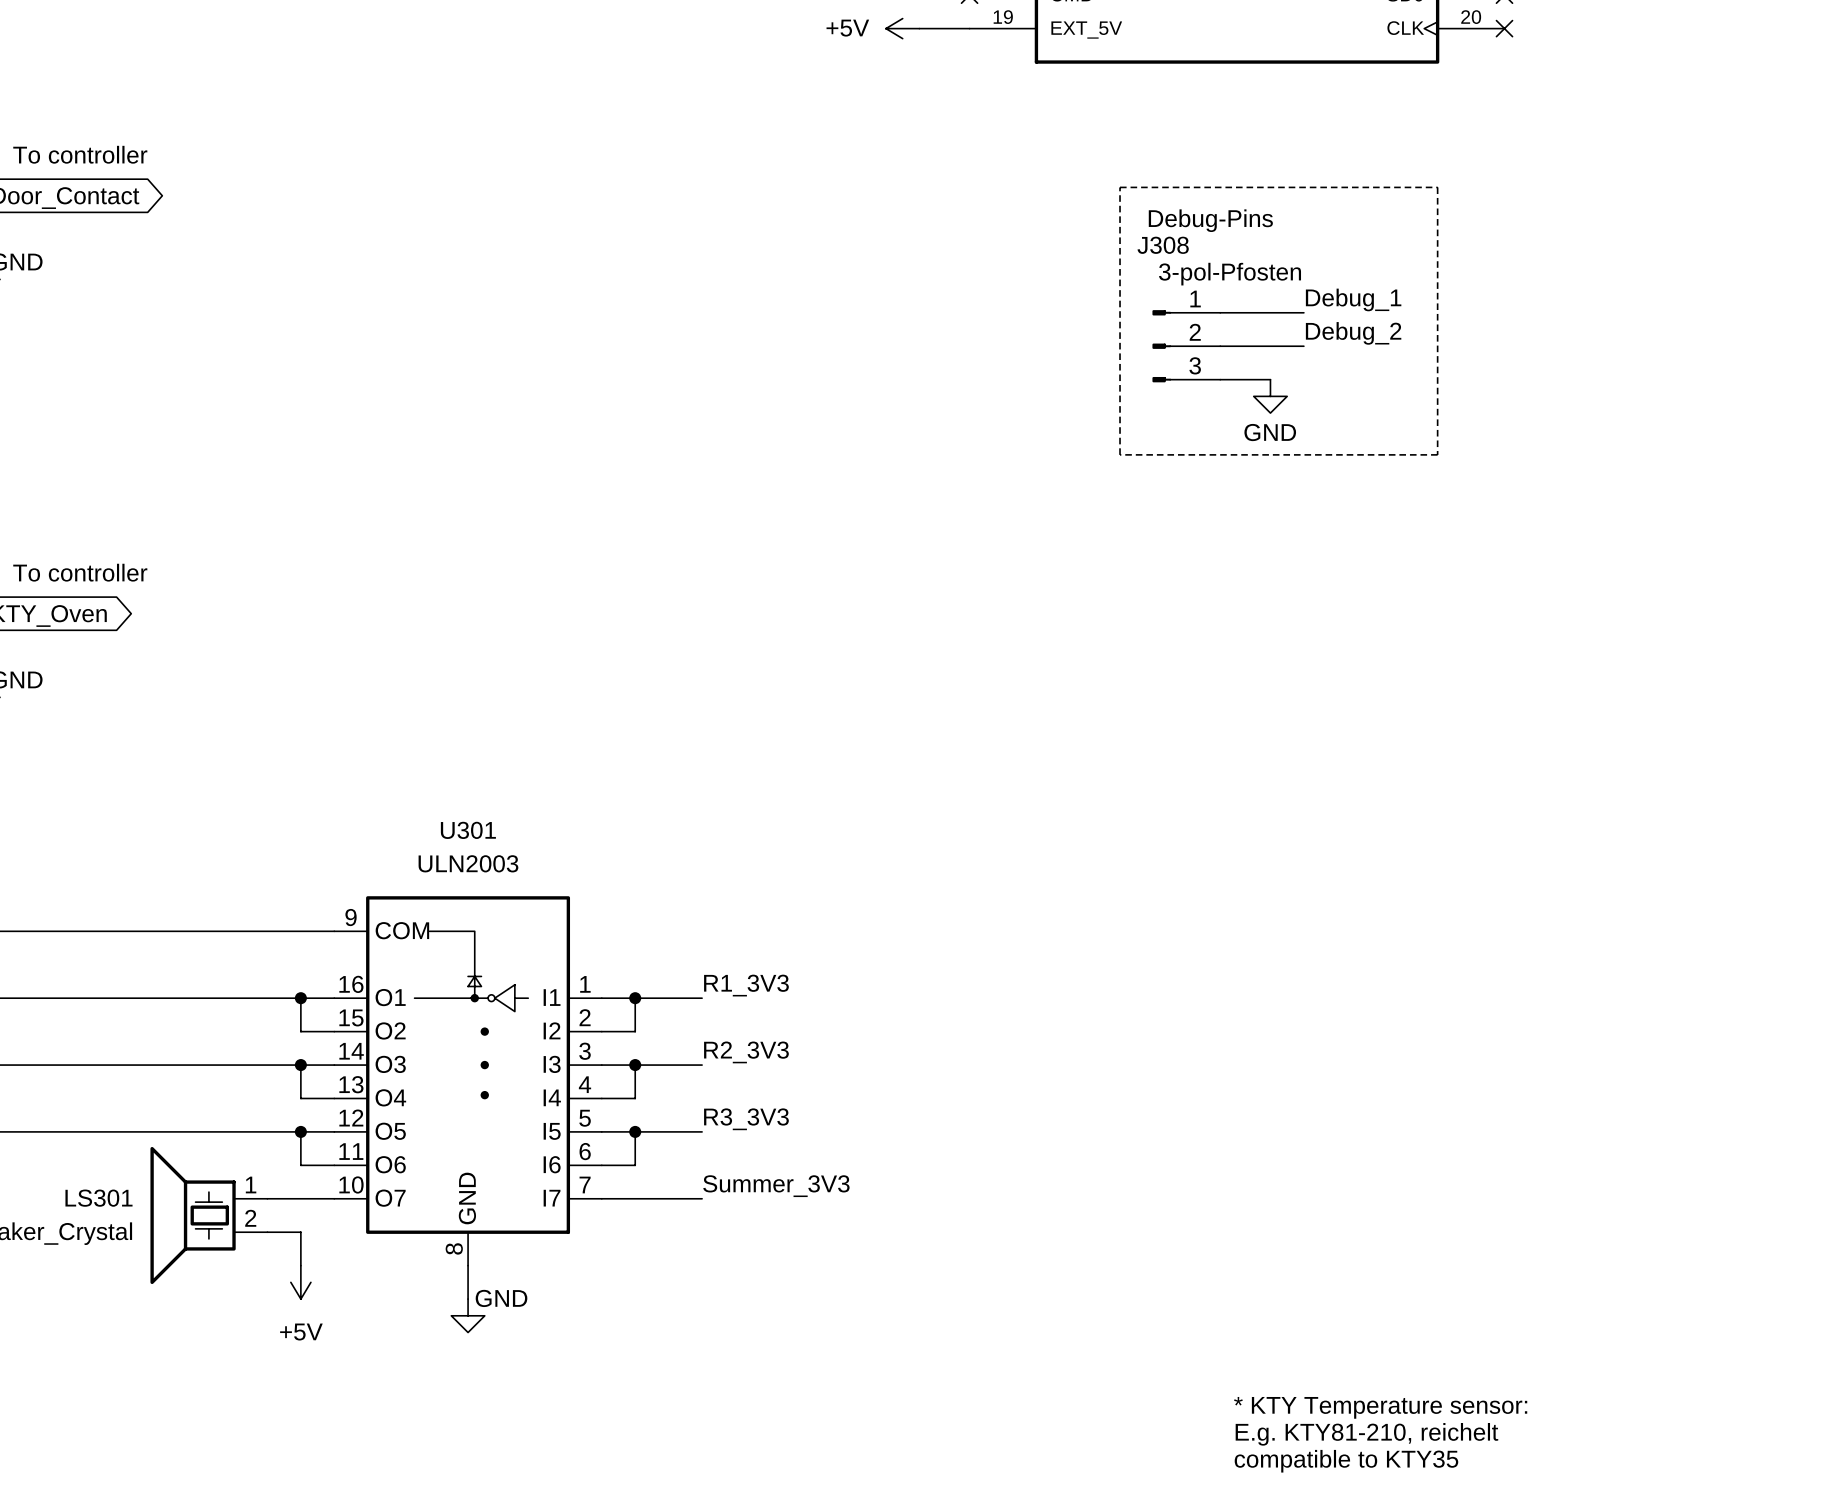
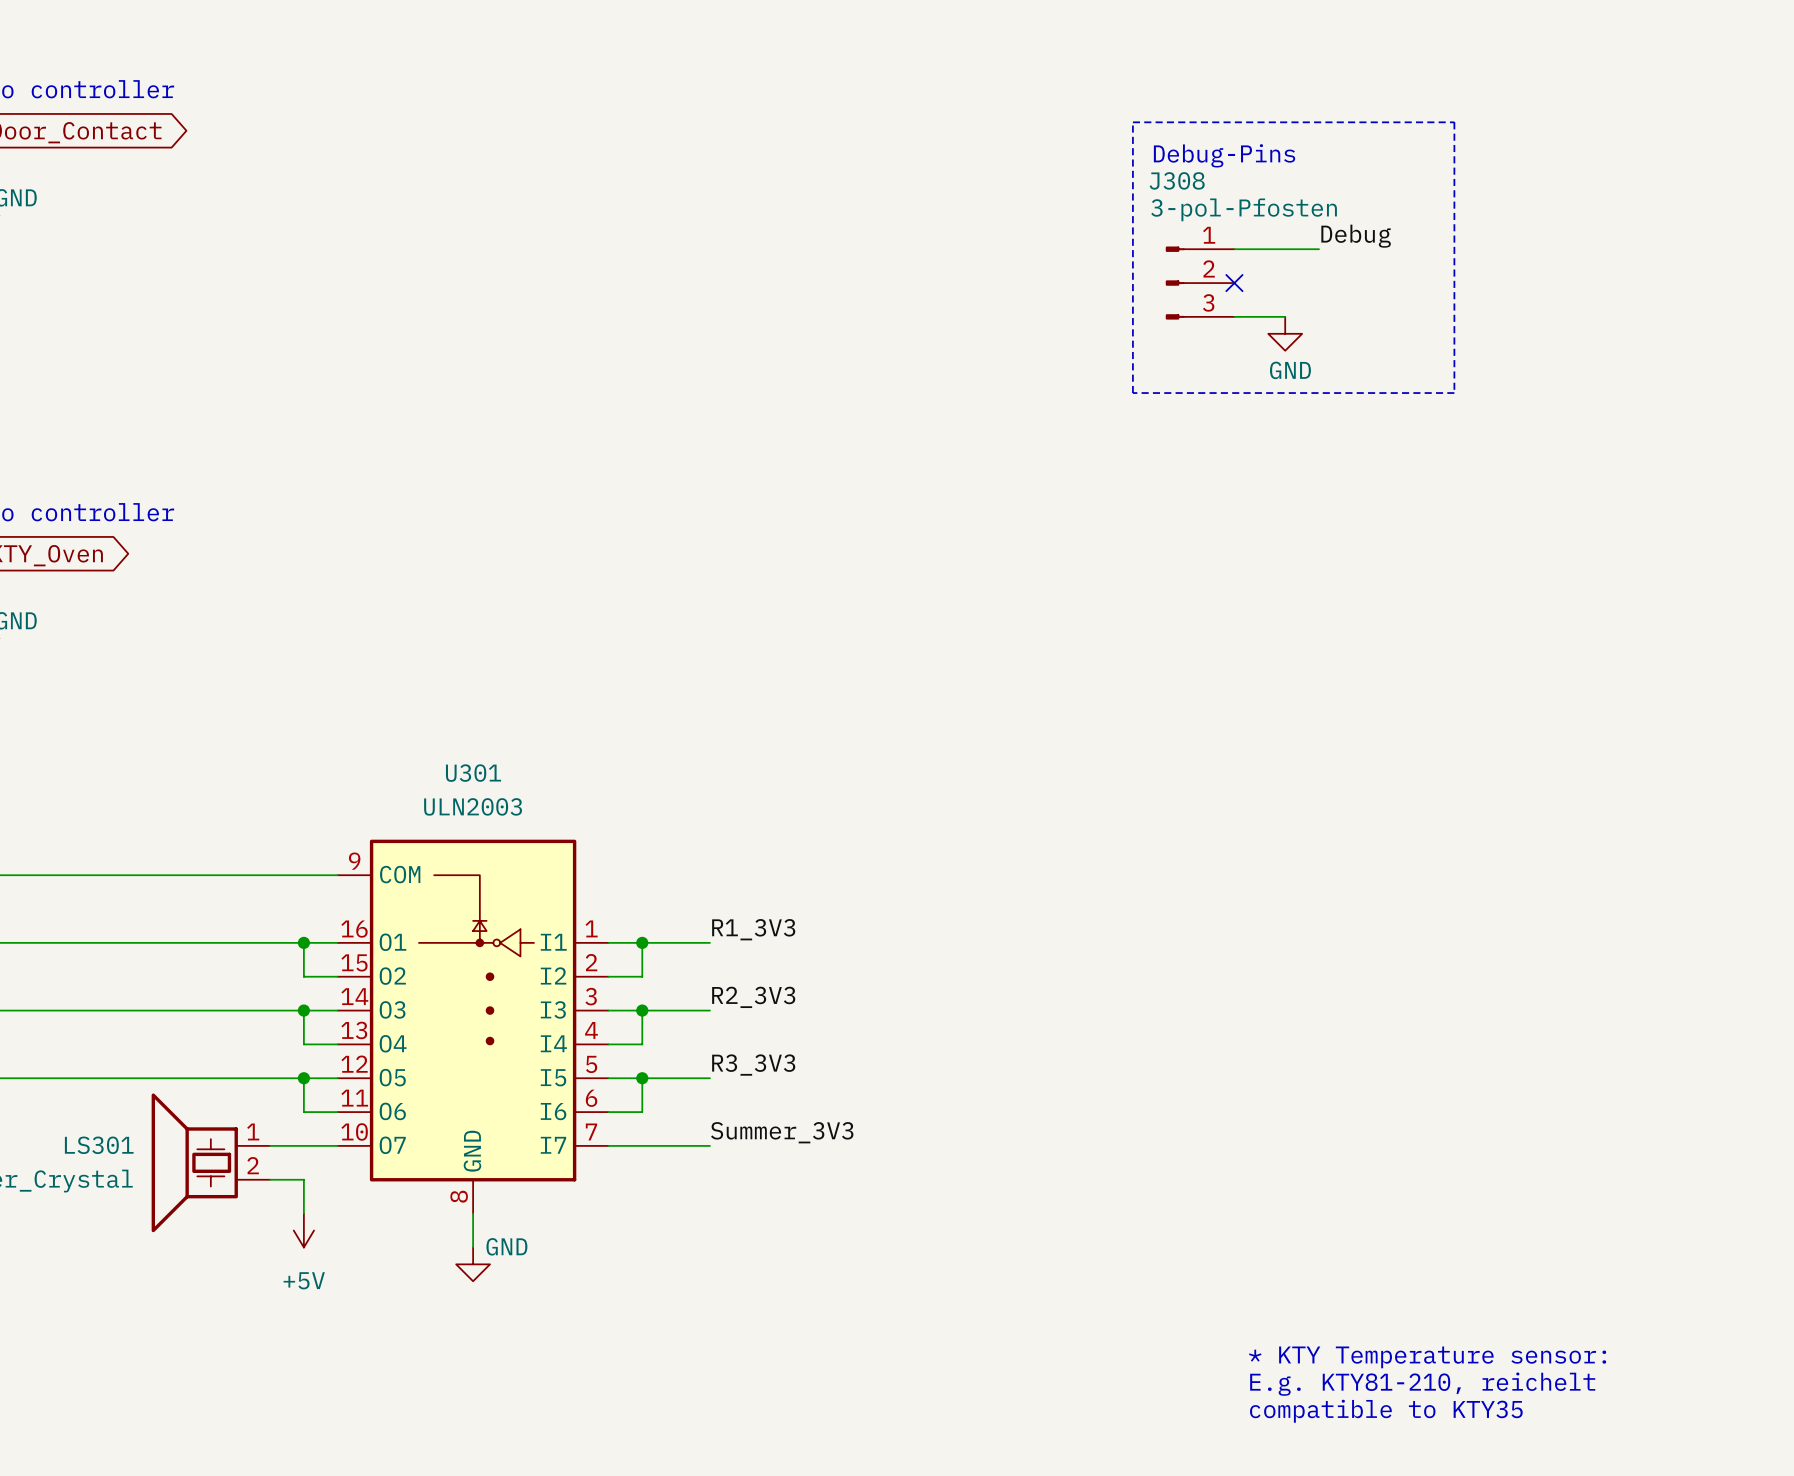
label: Debug_1 (1353, 299) -> Debug (1356, 236)
label: Debug_2 (1353, 333) -> none
wire: (1220, 346) (1303, 346) -> none
no-connect mark: none -> (1234, 283)

